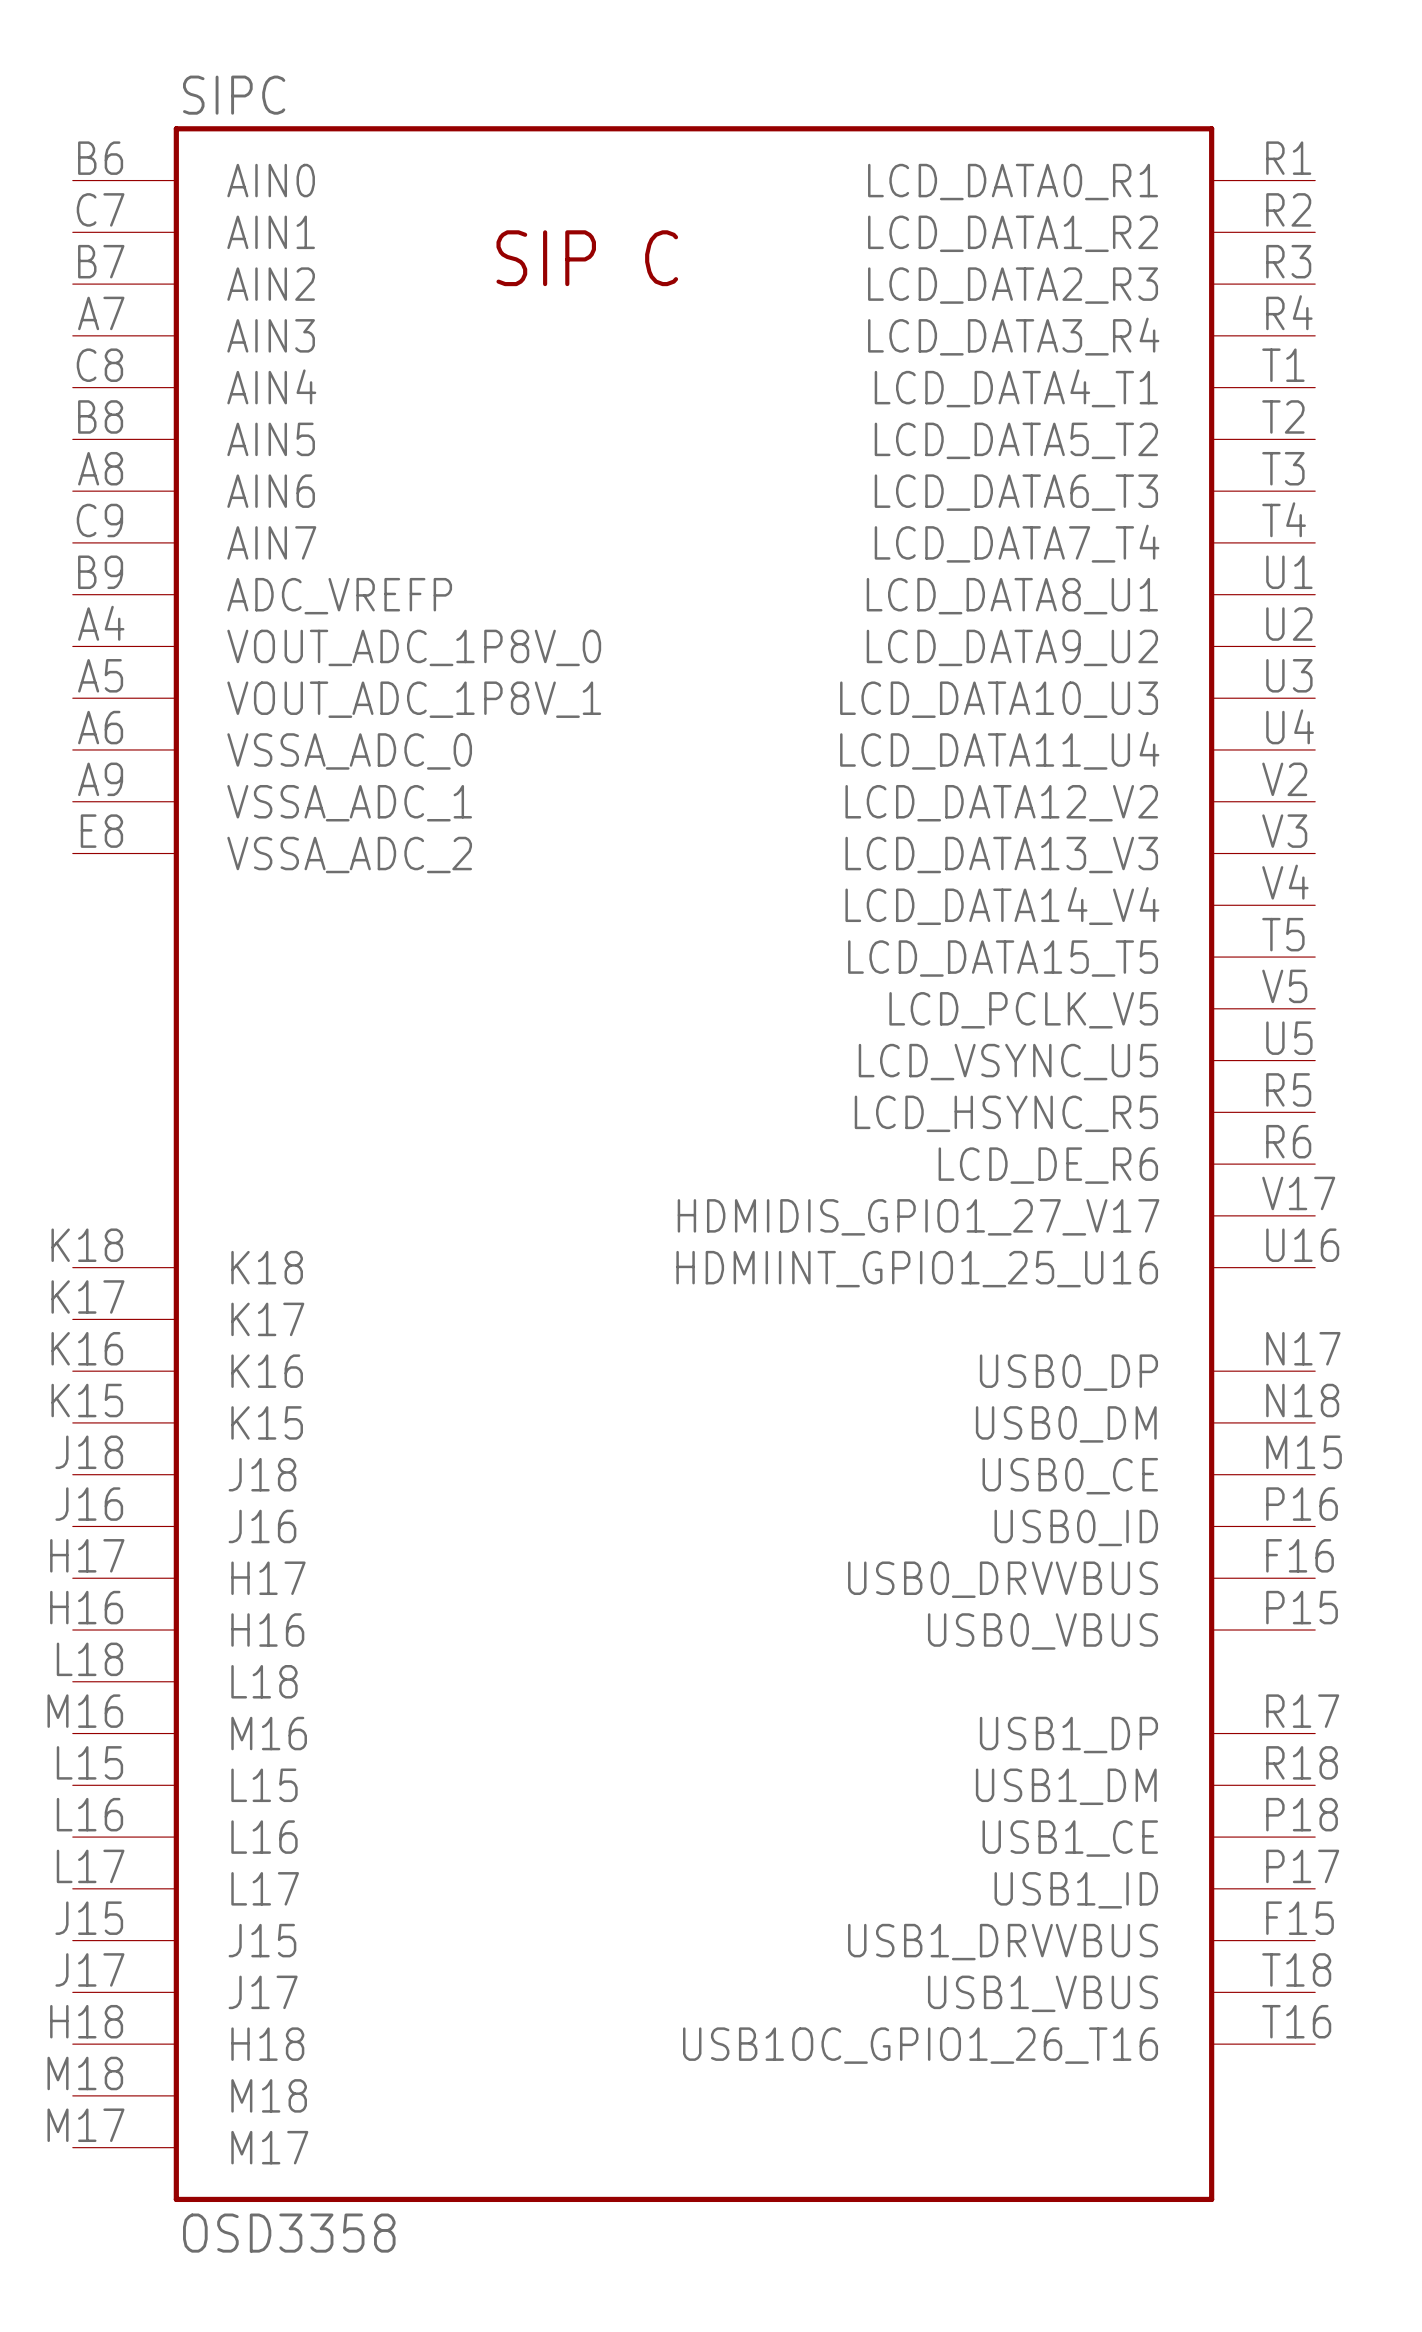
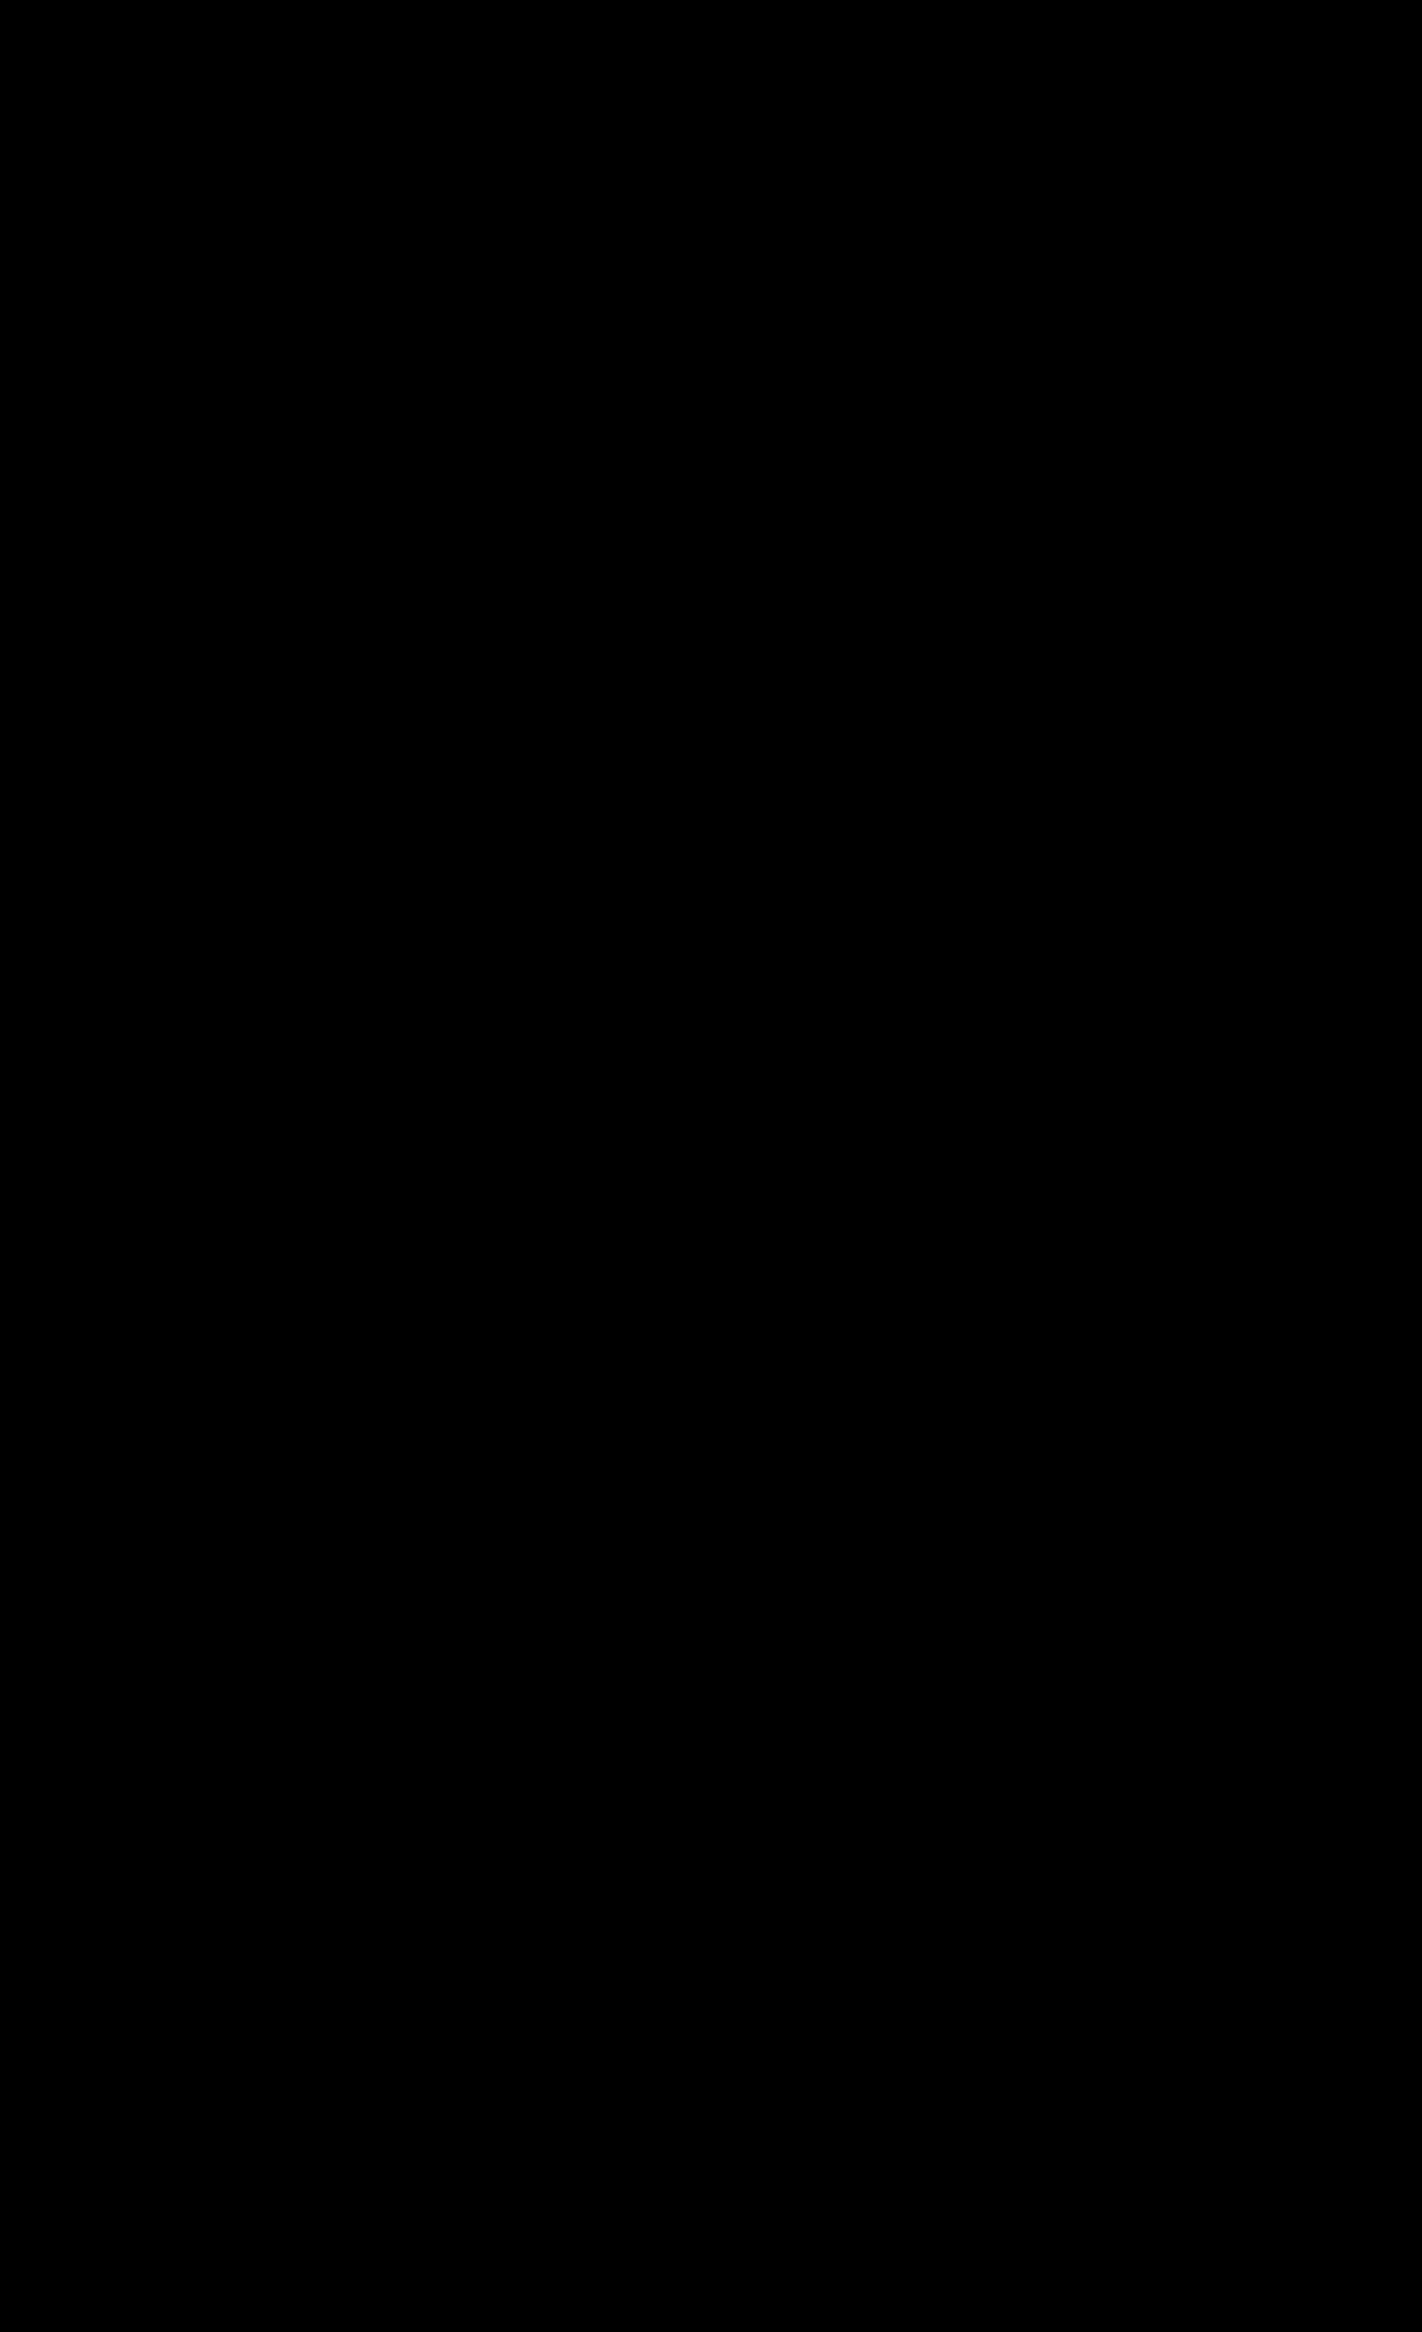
SIPC: OSD3358 (693, 1164) -> none

